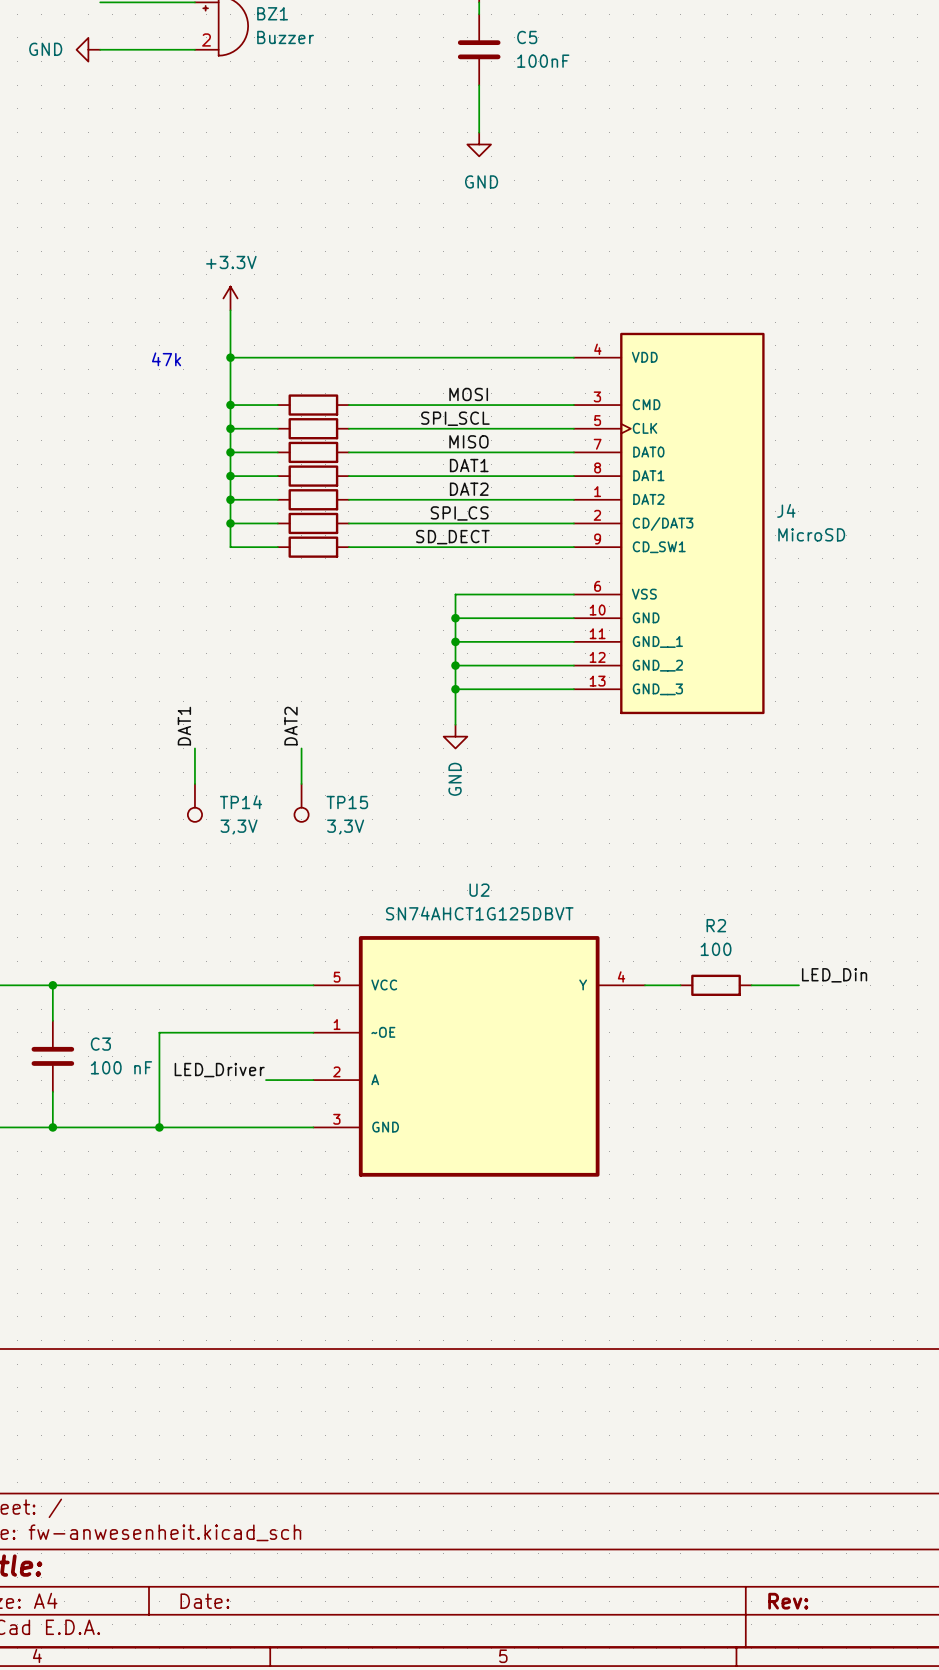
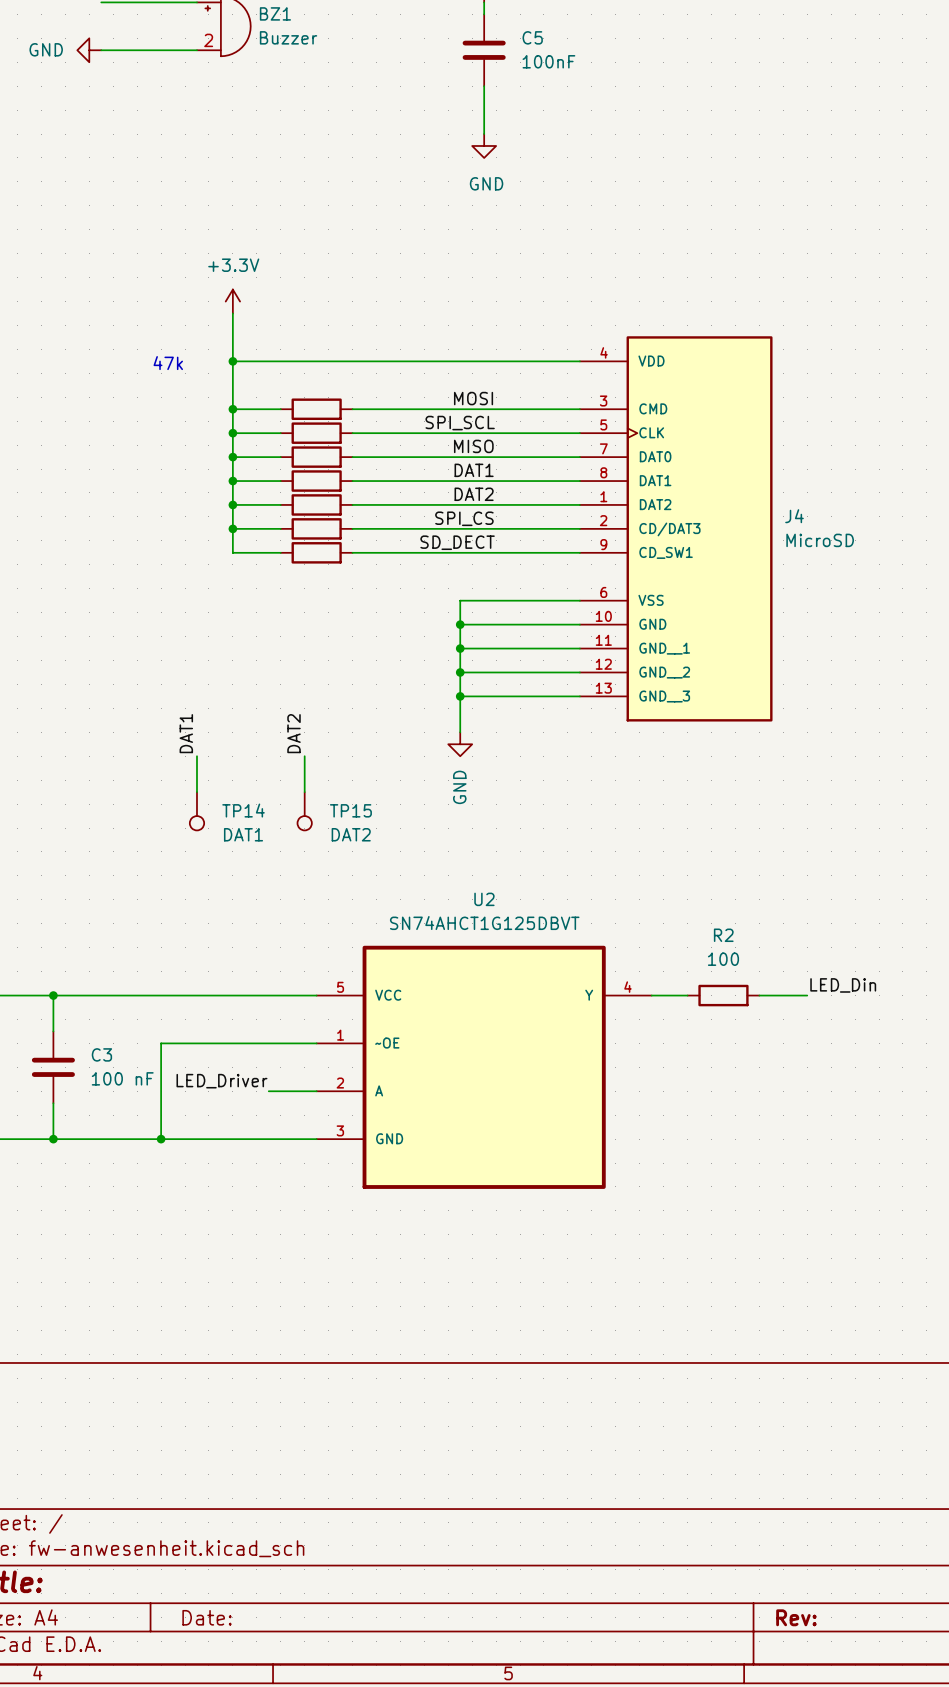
TP14 value: 3,3V (239, 827) -> DAT1 (243, 834)
TP15 value: 3,3V (345, 827) -> DAT2 (351, 834)

